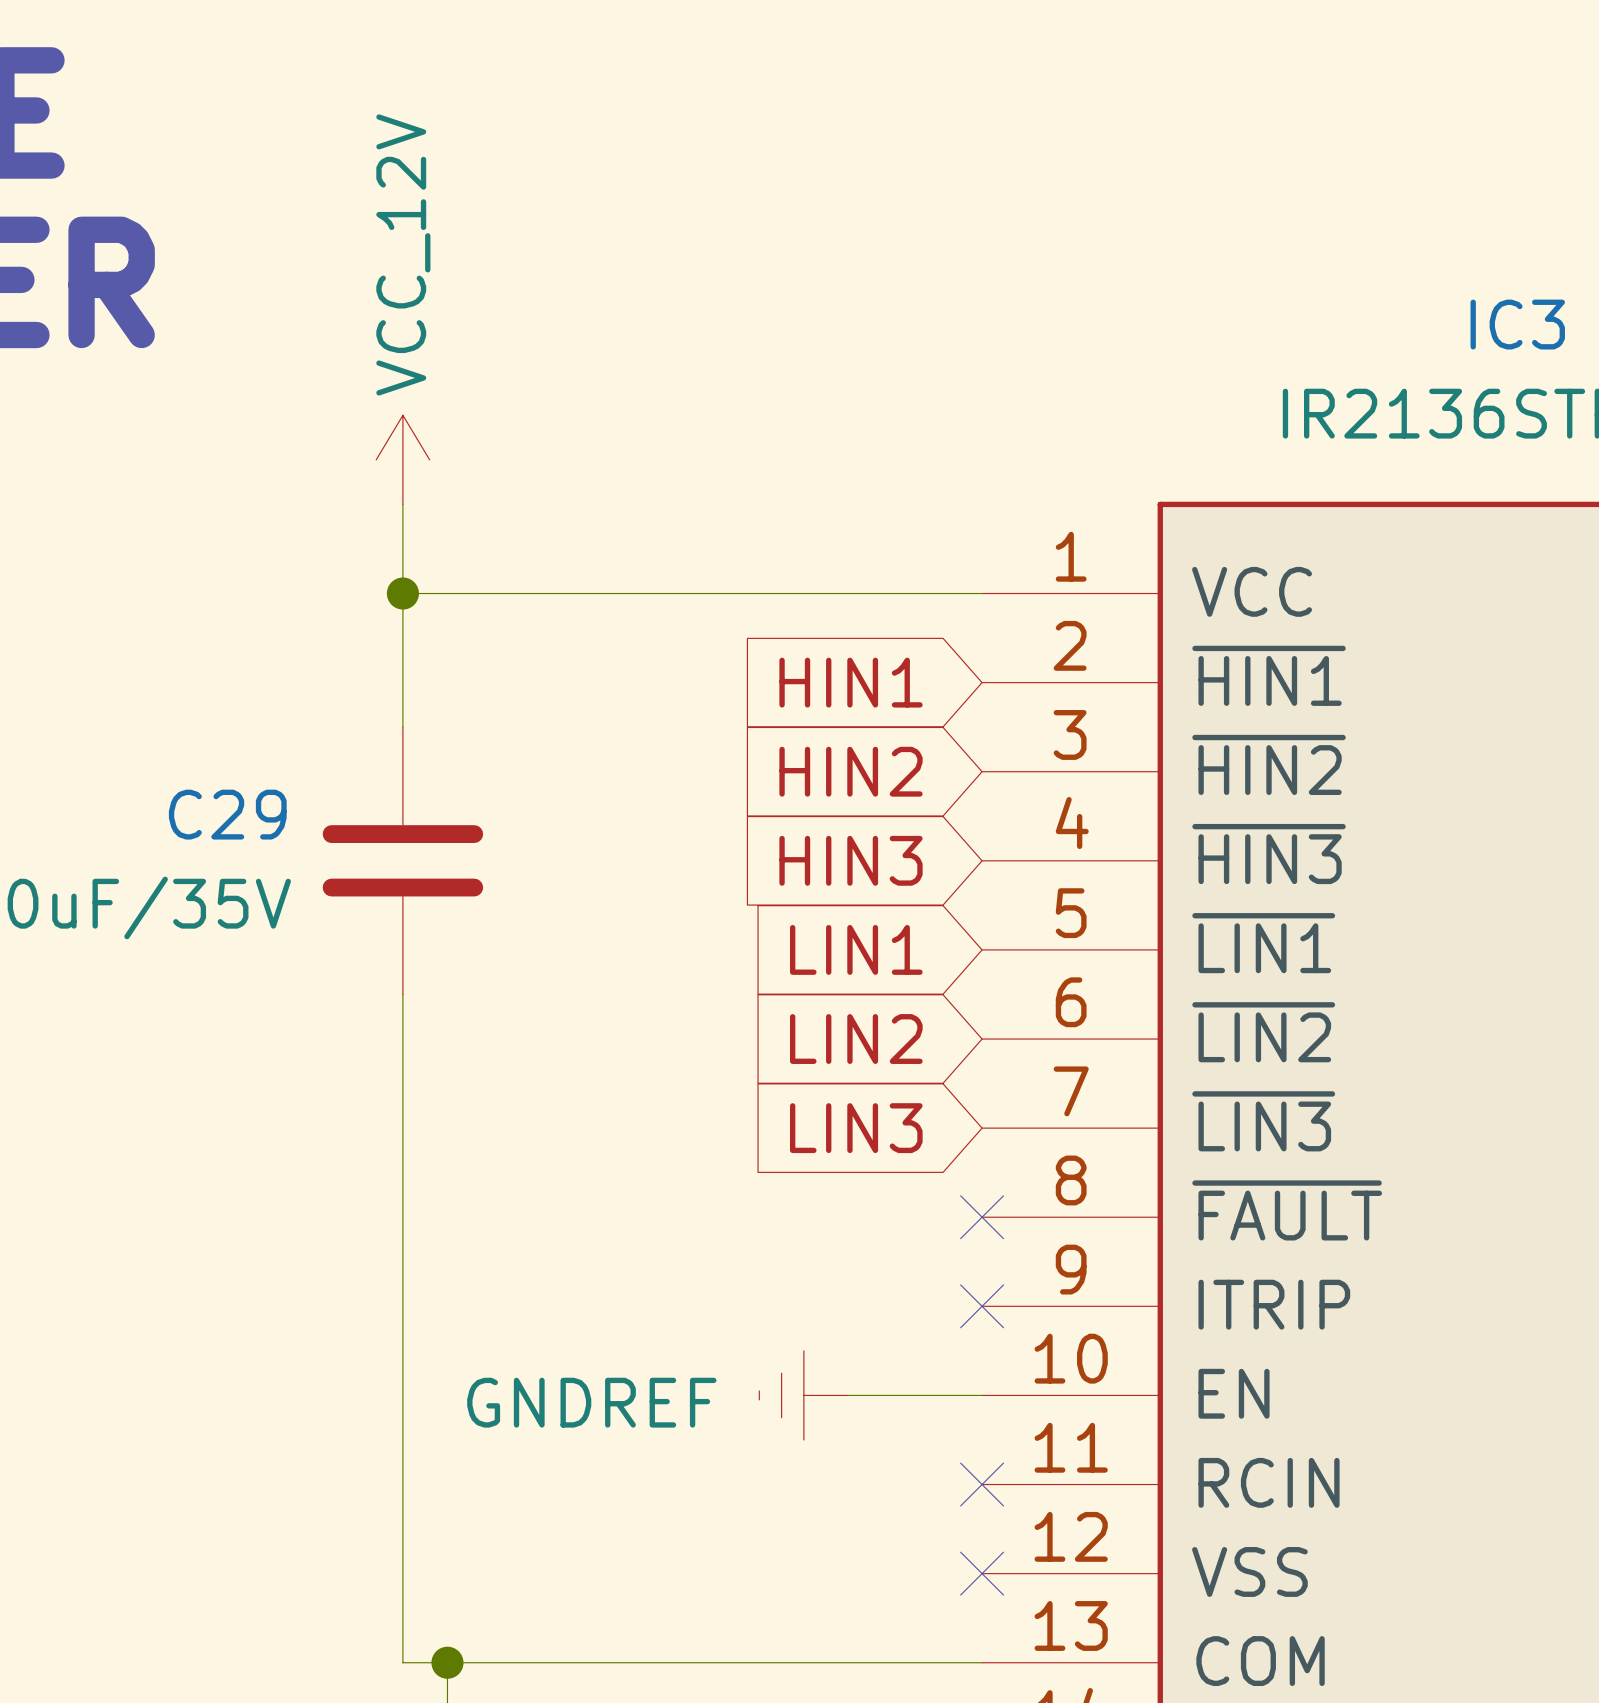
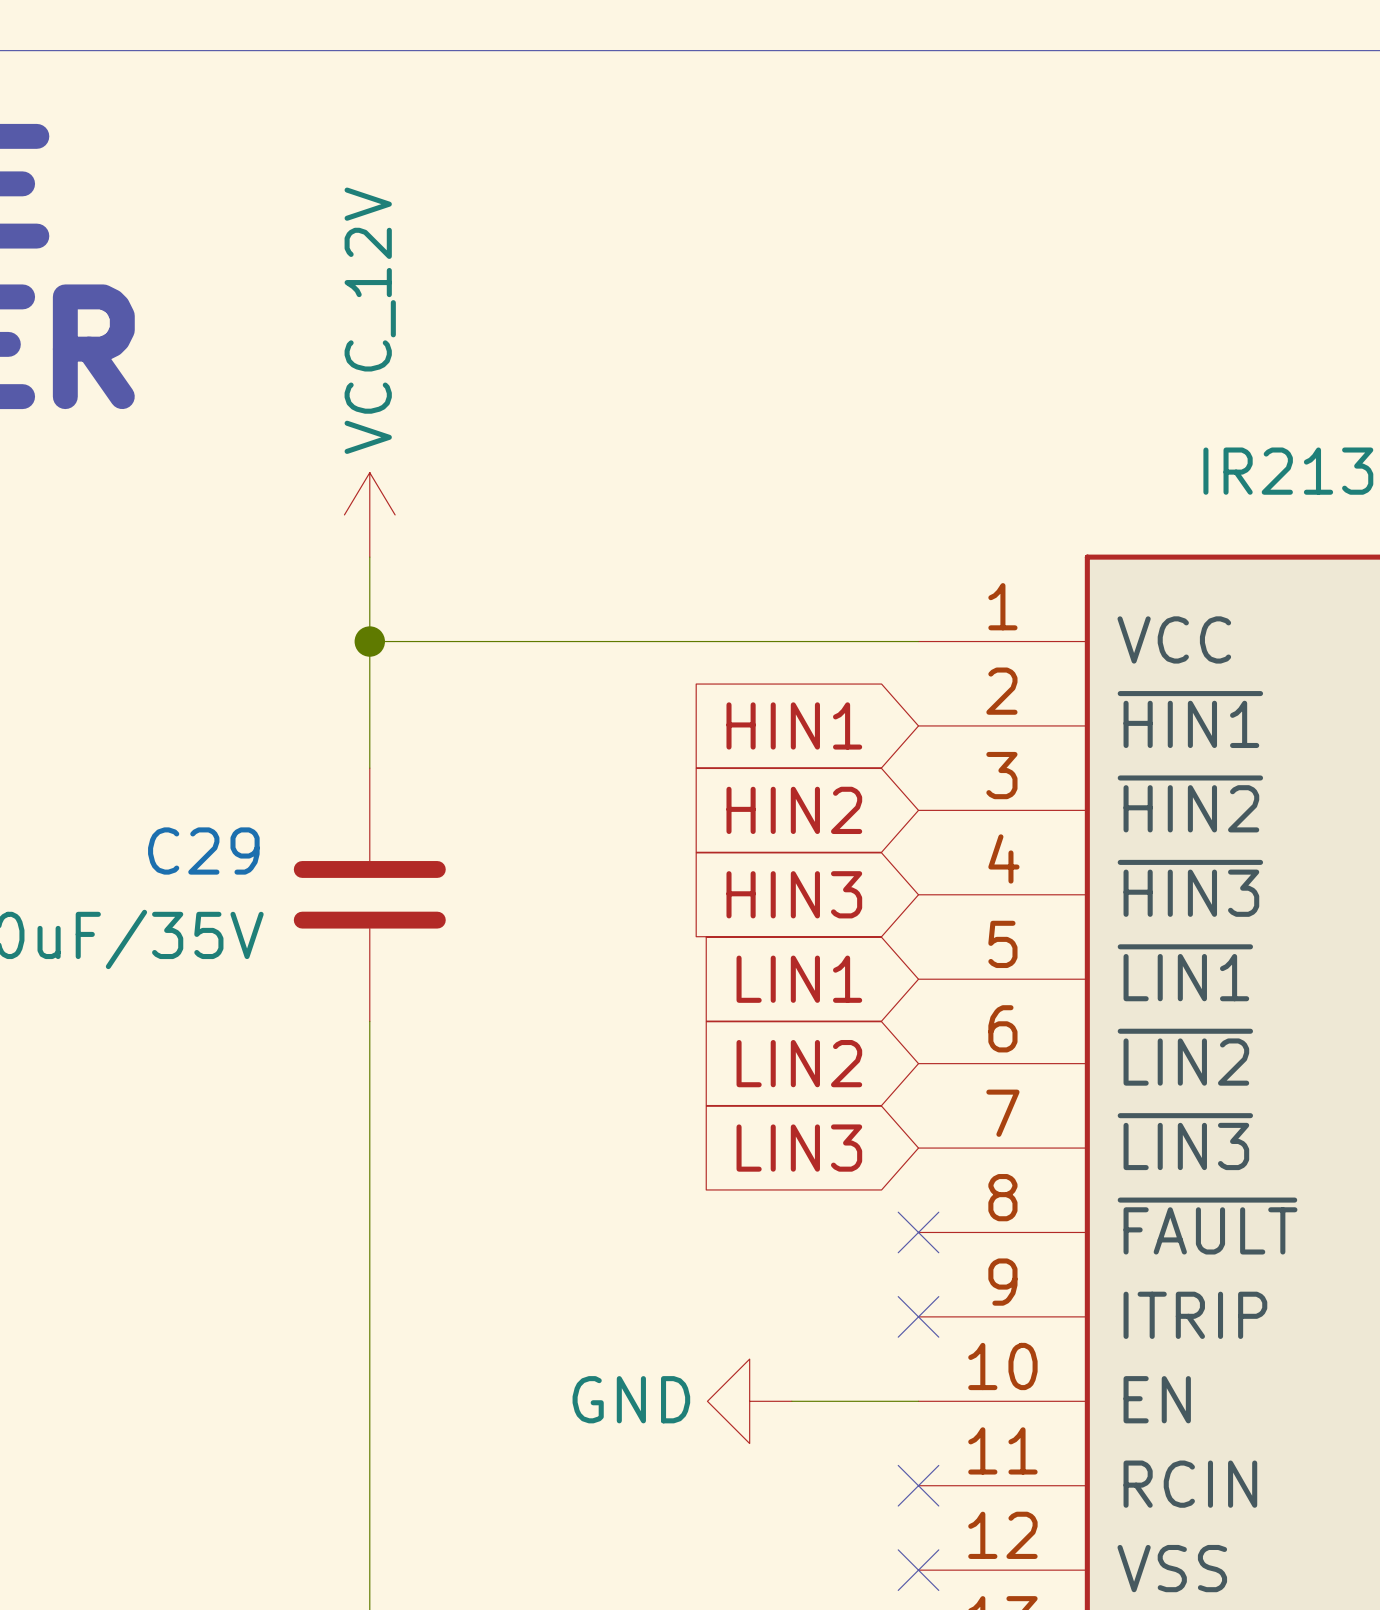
power symbol: GNDREF (803, 1395) -> GND (749, 1401)

